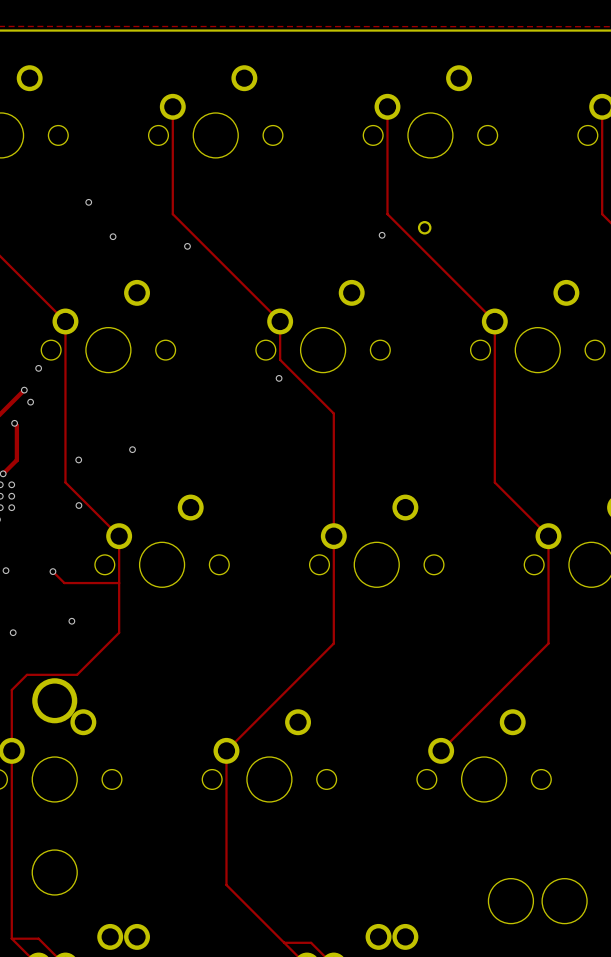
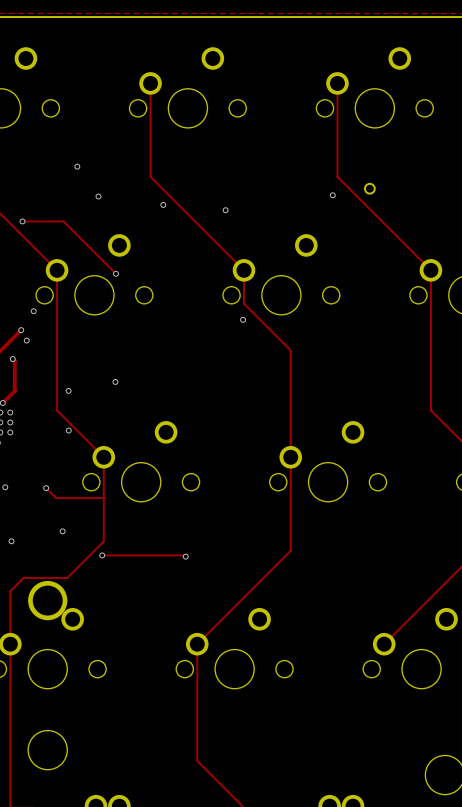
via: none -> (225, 210)
track: none -> (22, 221) (63, 221) (115, 273)
via: none -> (22, 221)
via: none -> (115, 273)
track: none -> (102, 555) (185, 556)
via: none -> (102, 555)
via: none -> (185, 556)

